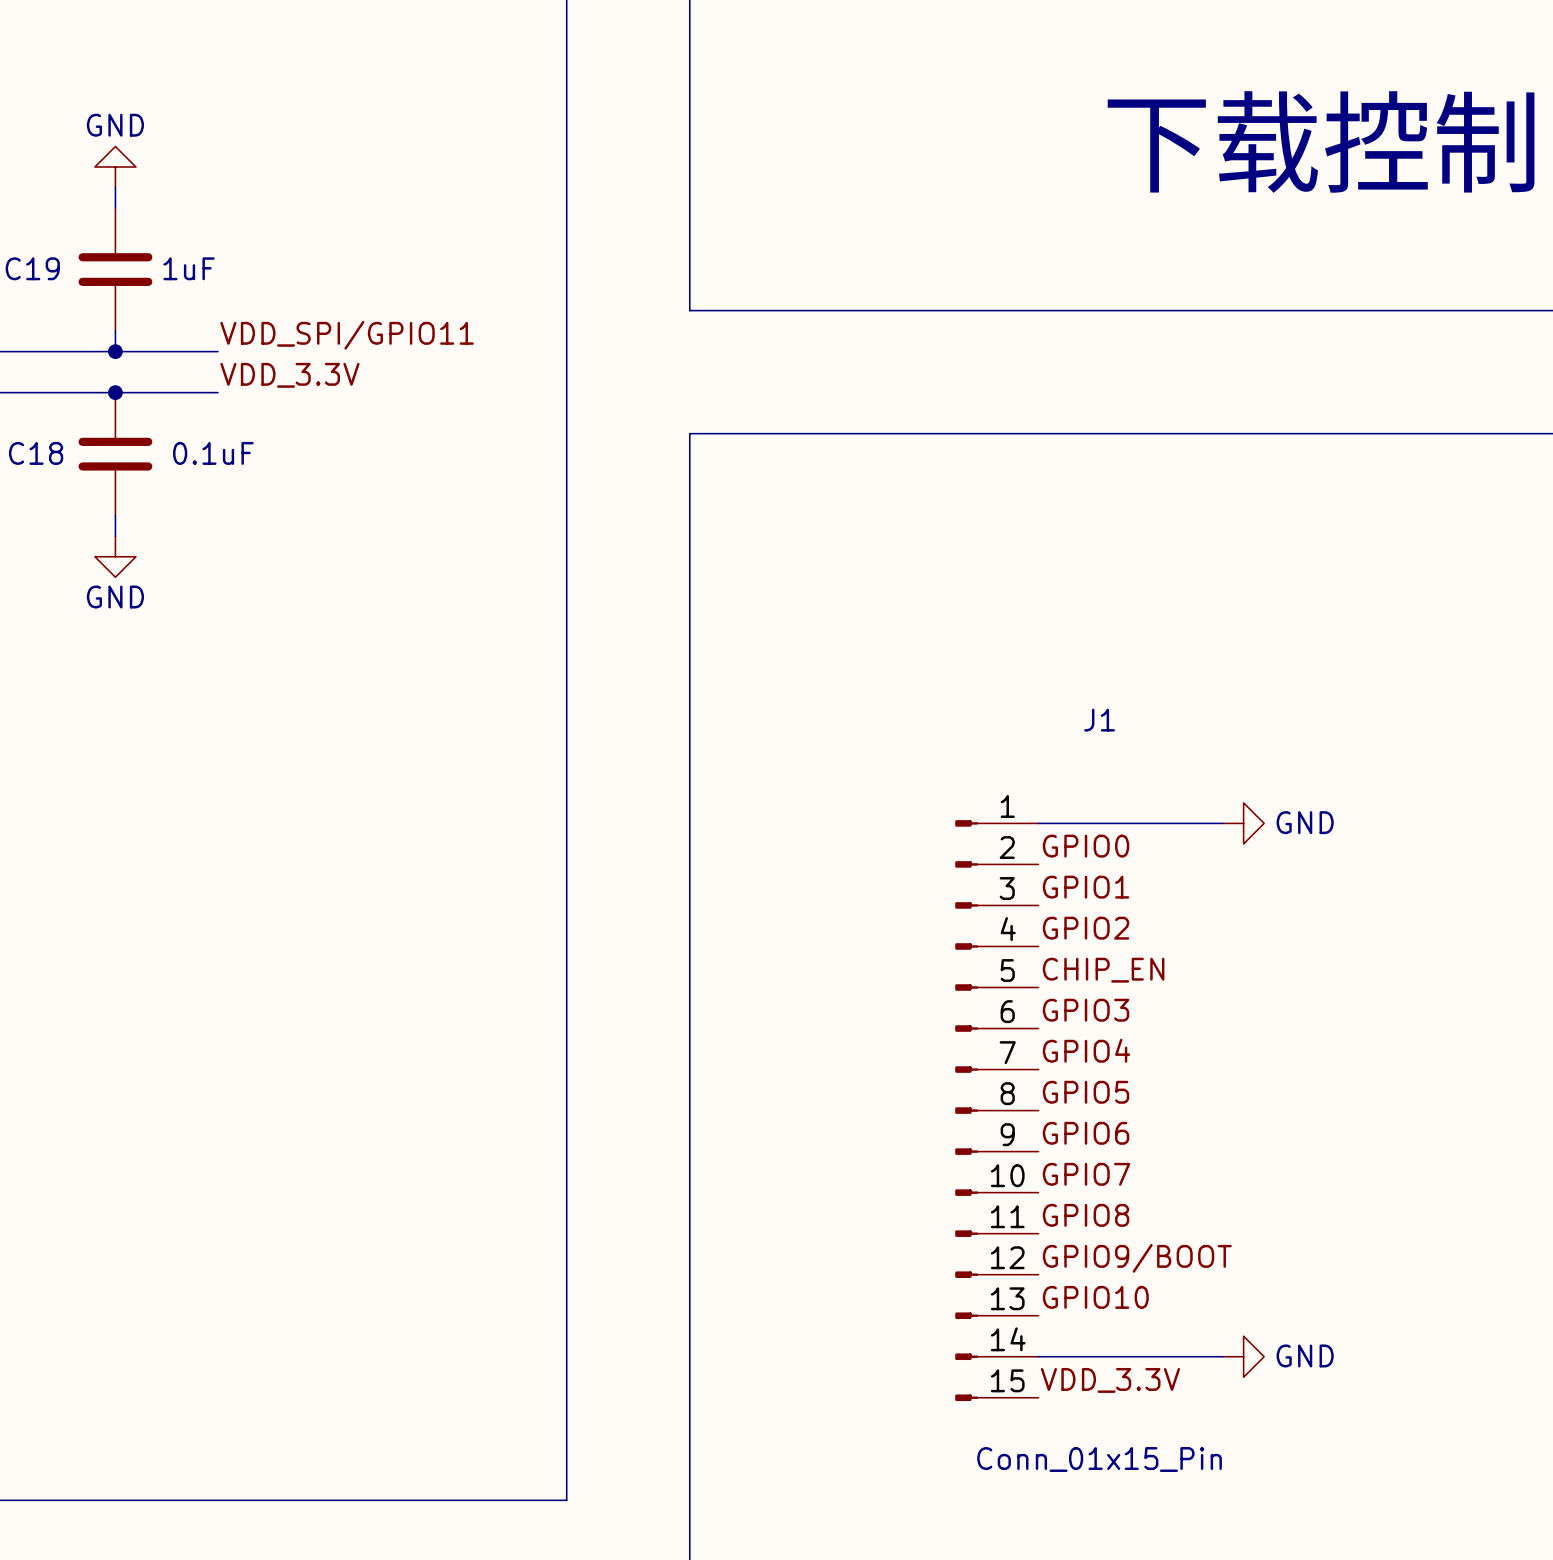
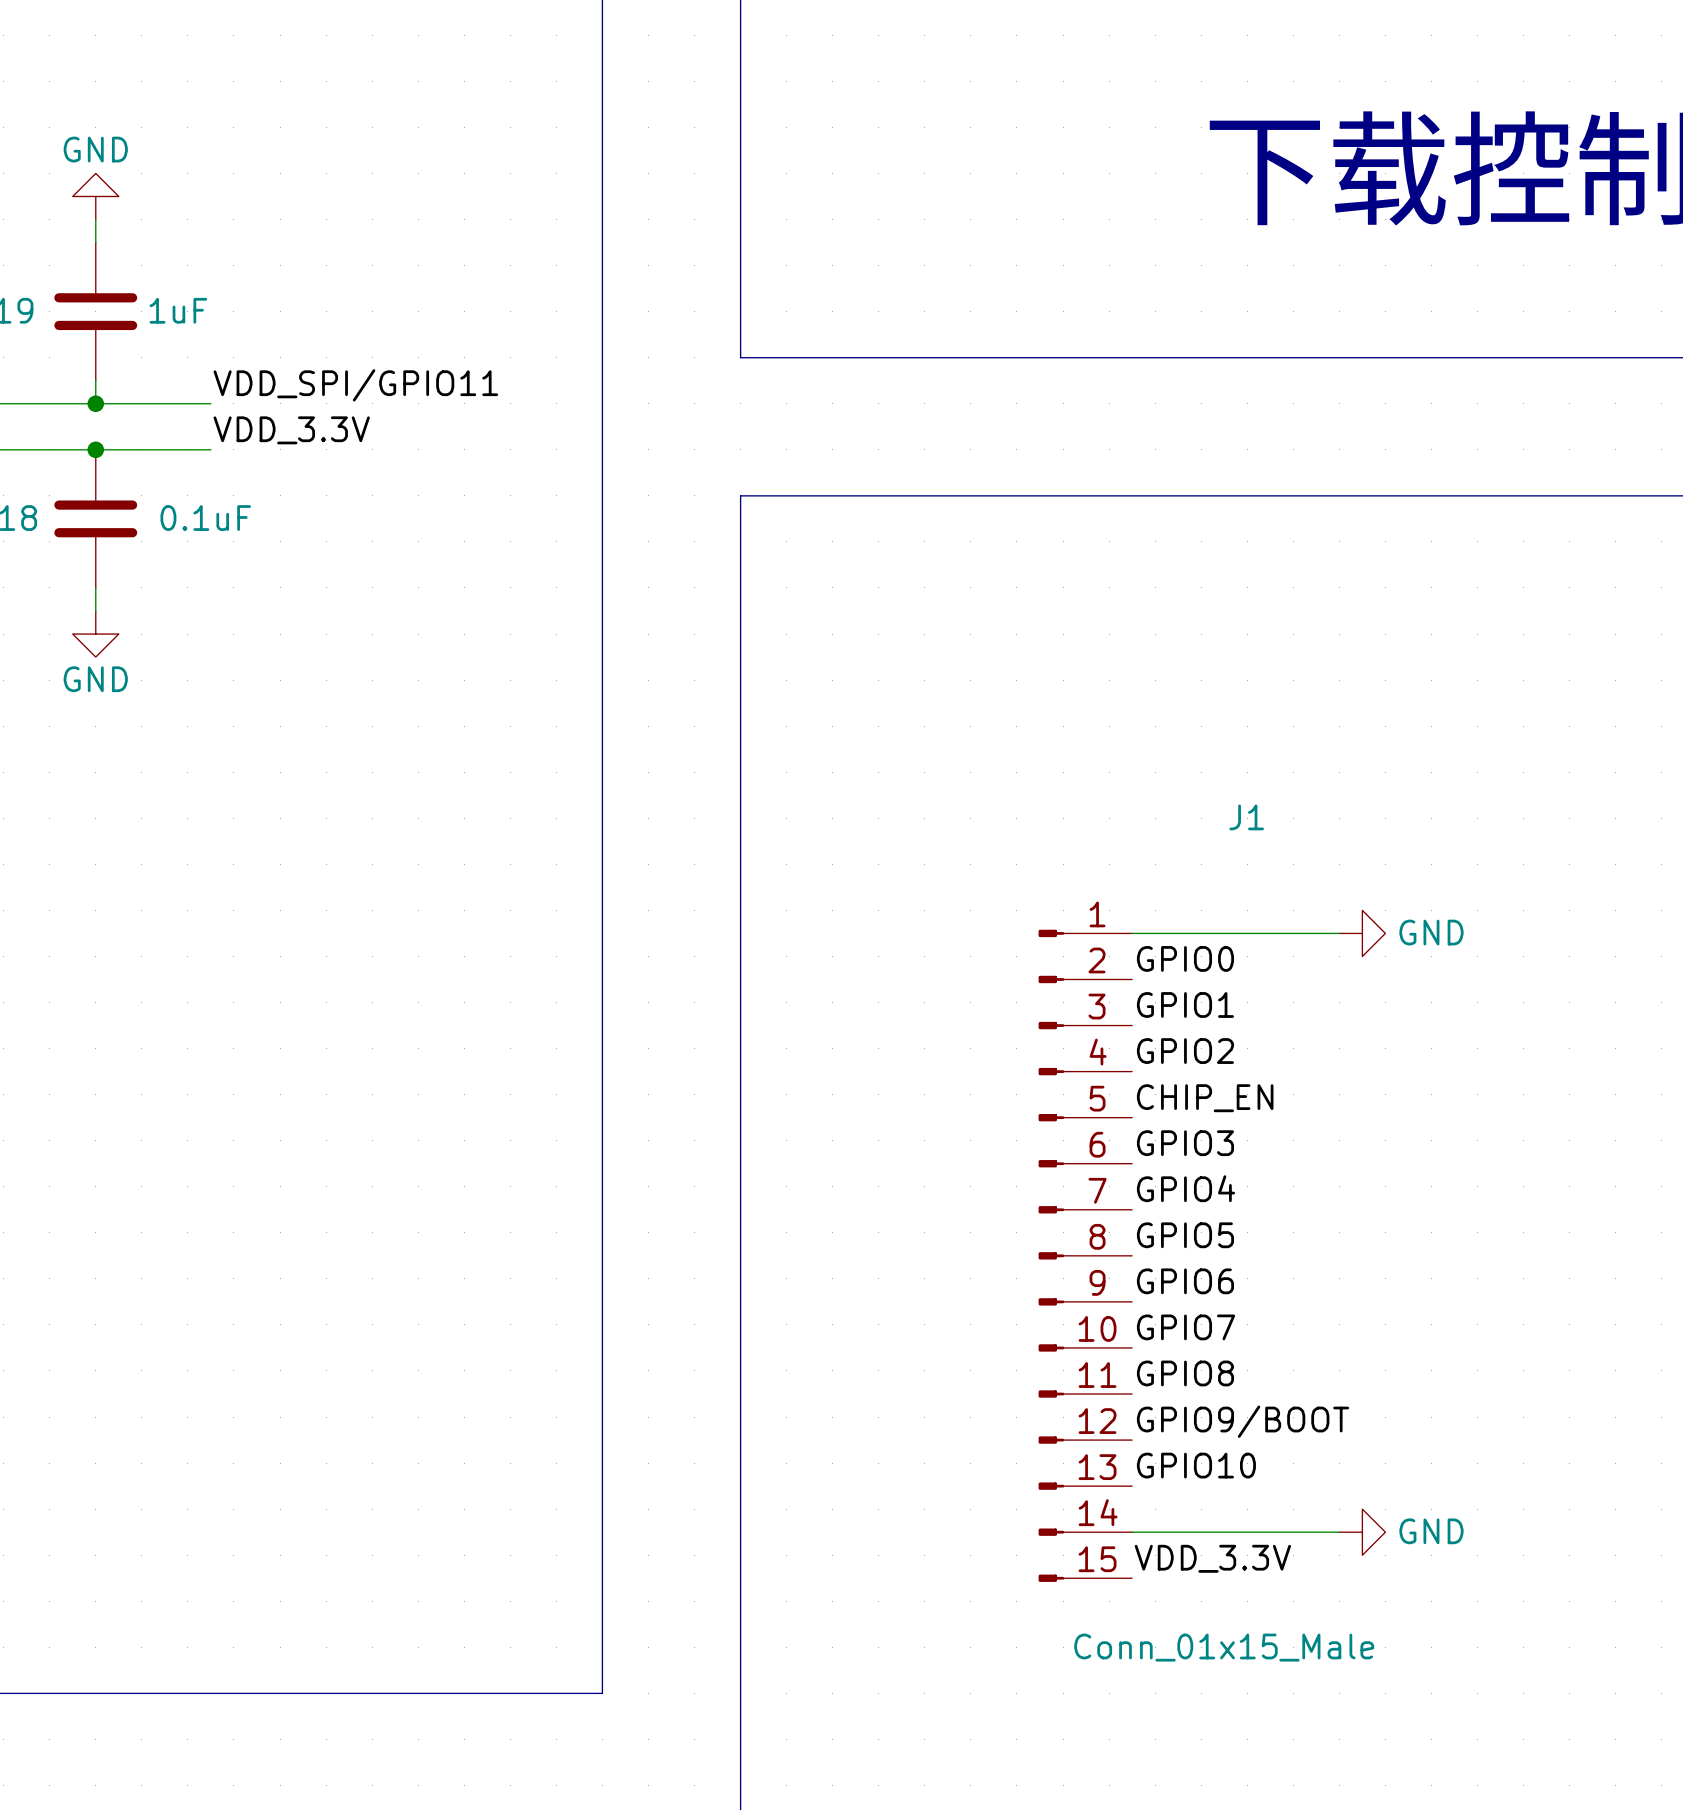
J1 name position: J1 (1099, 720) -> J1 (1246, 817)
J1 value: Conn_01x15_Pin (1099, 1459) -> Conn_01x15_Male (1224, 1647)

